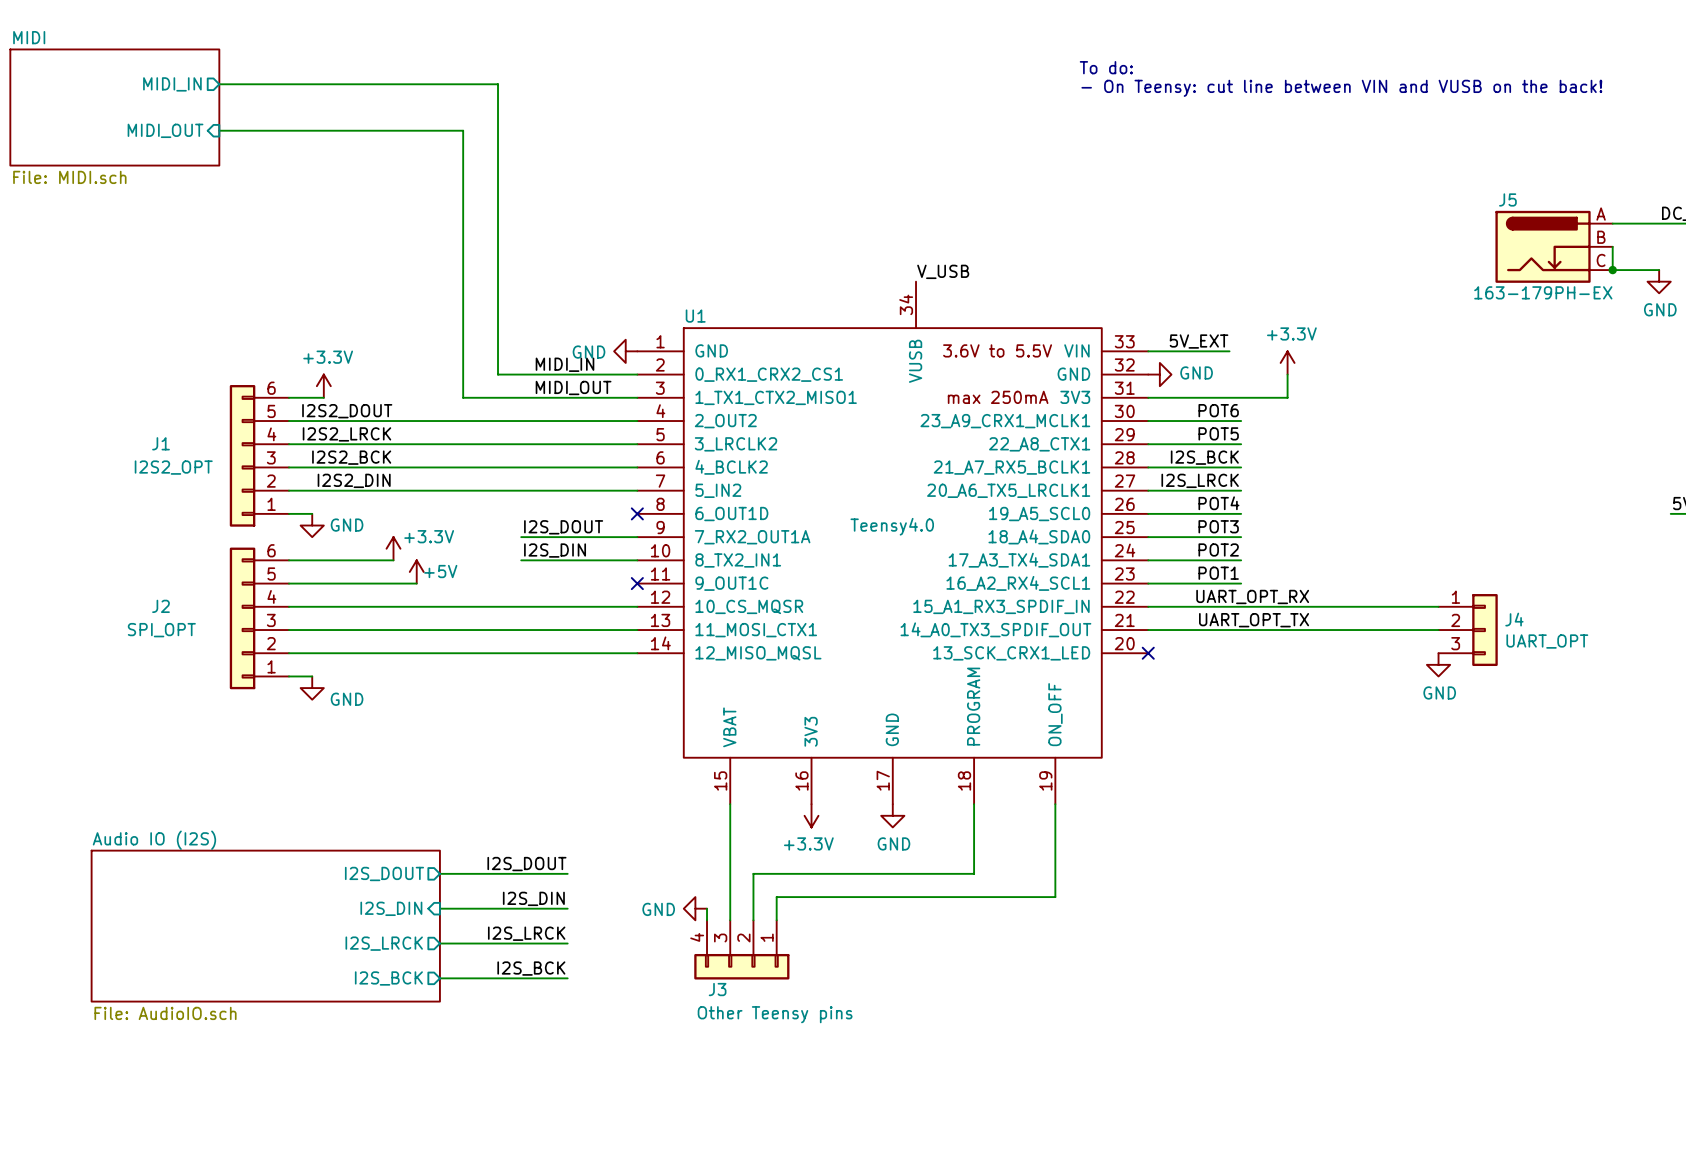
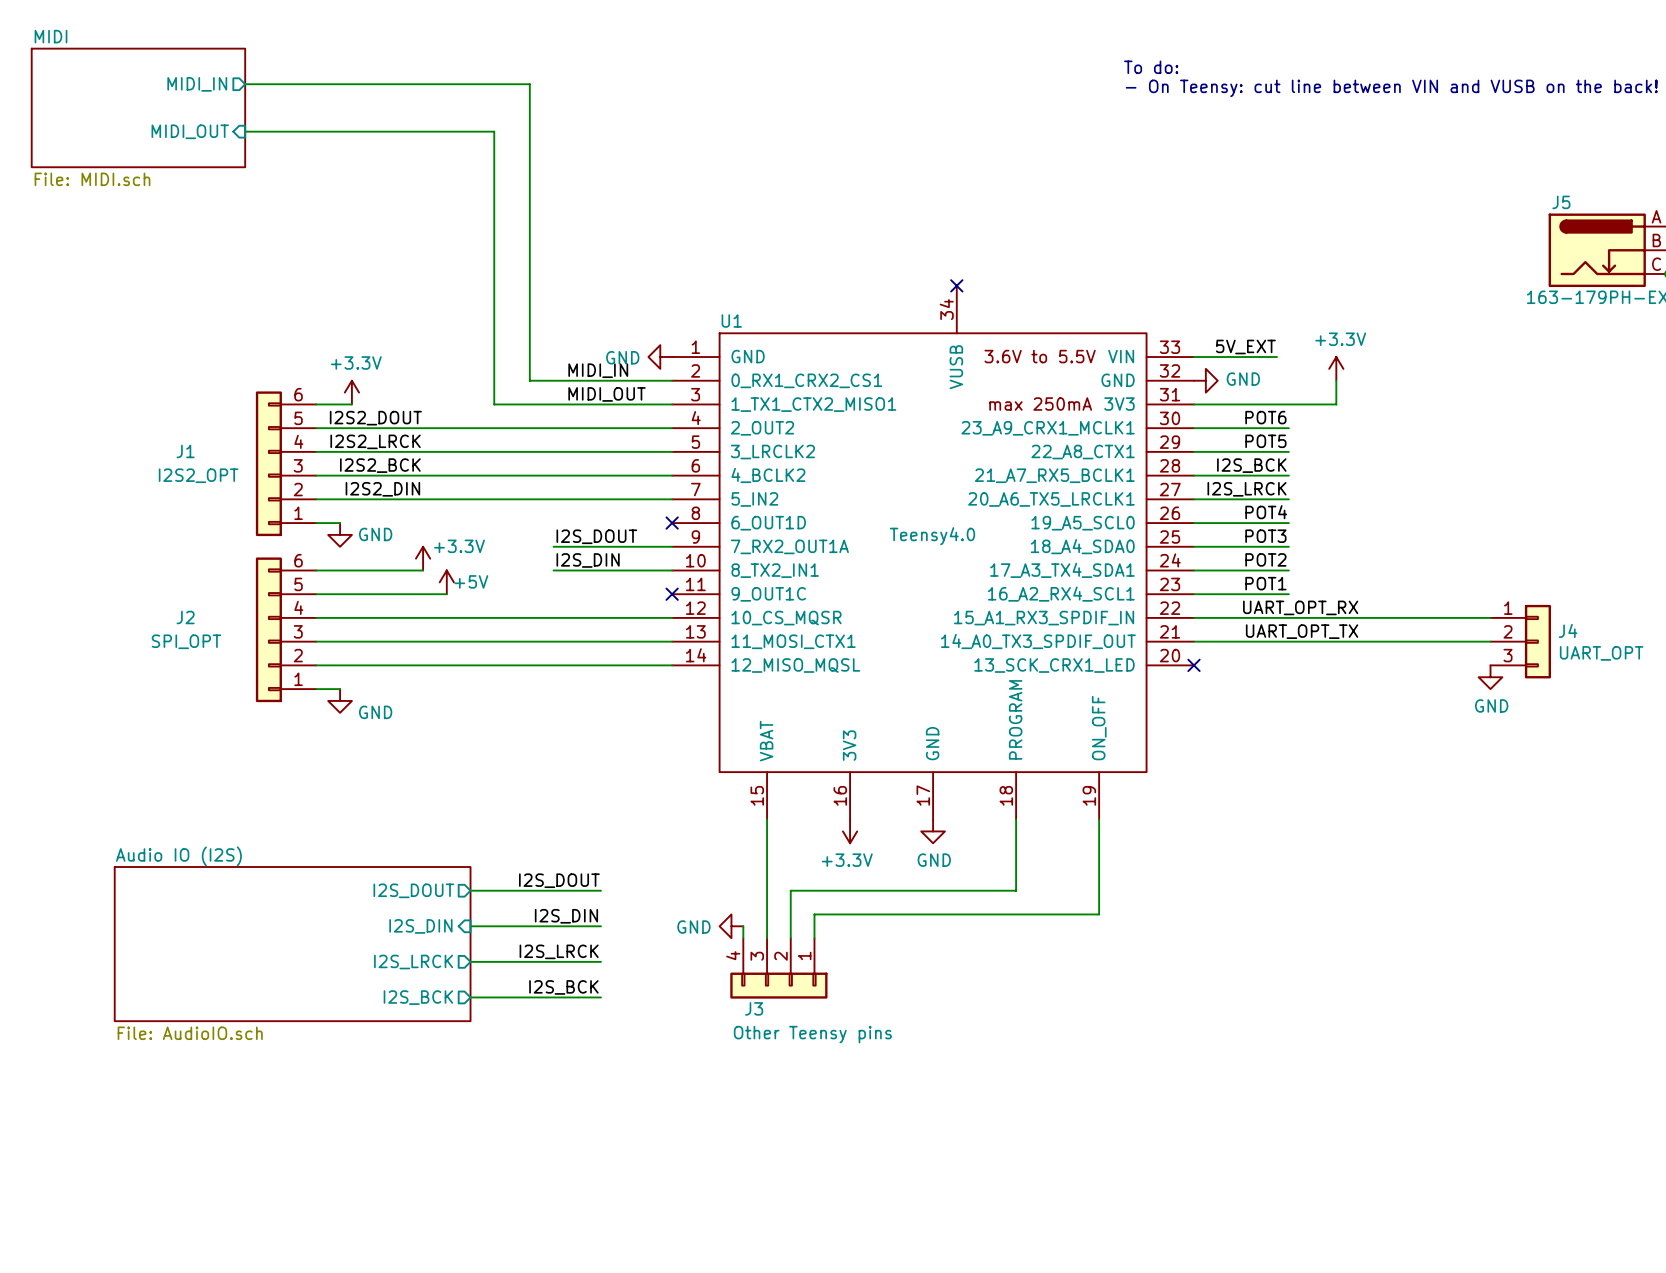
label: V_USB (943, 271) -> none
no-connect mark: none -> (956, 285)

